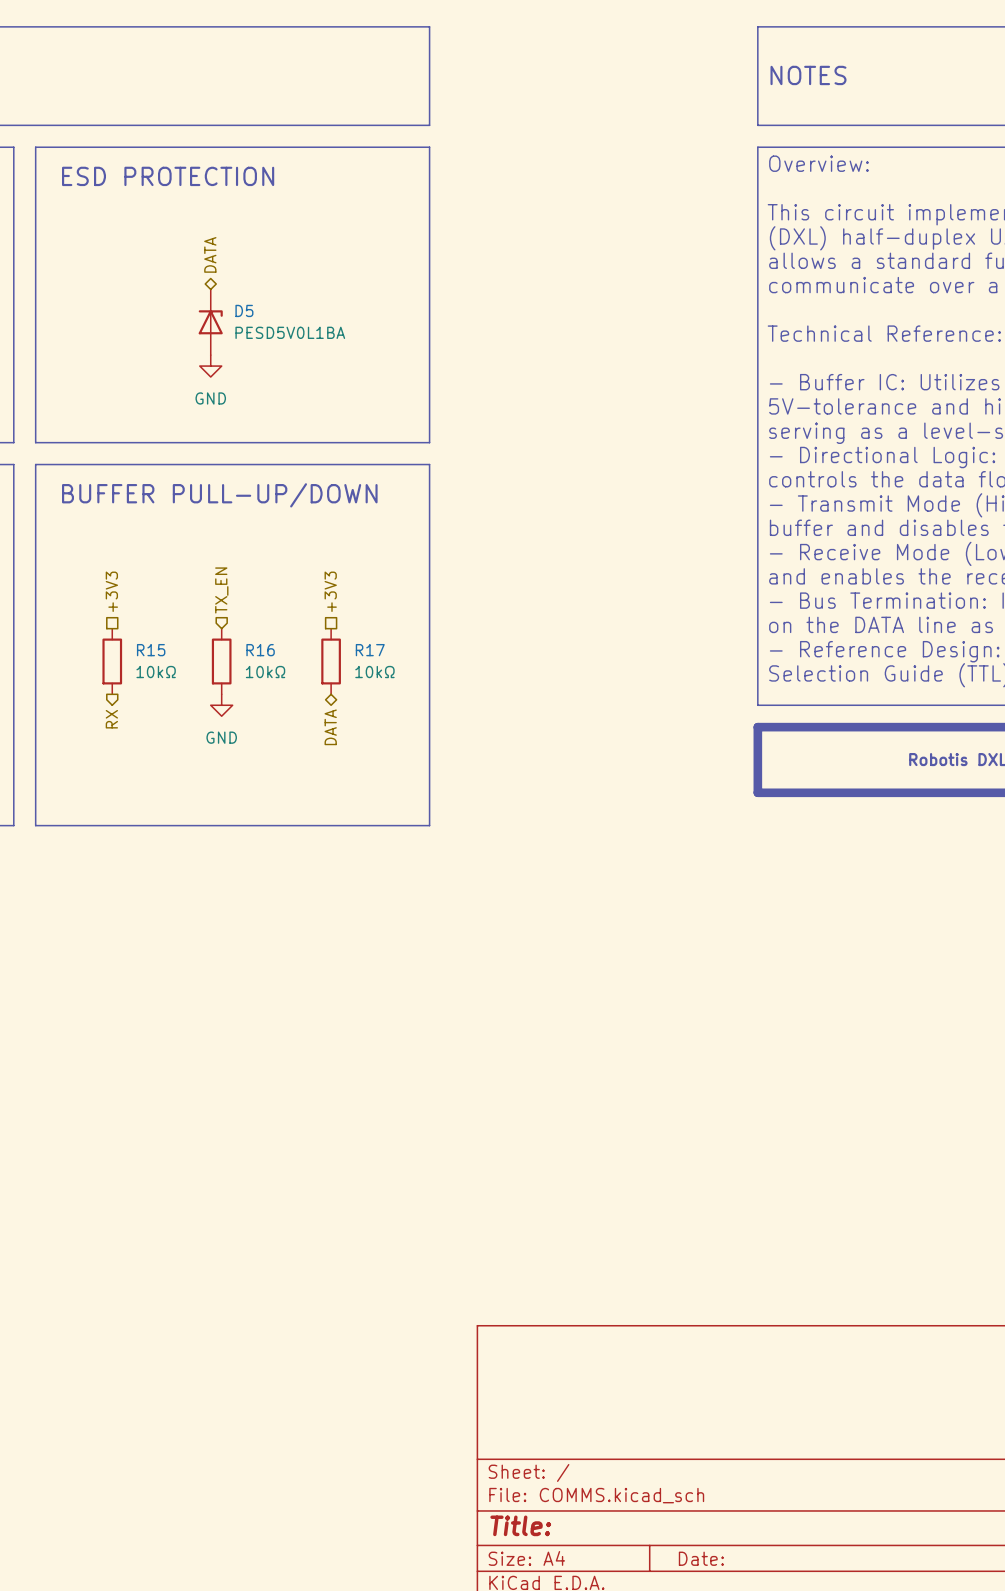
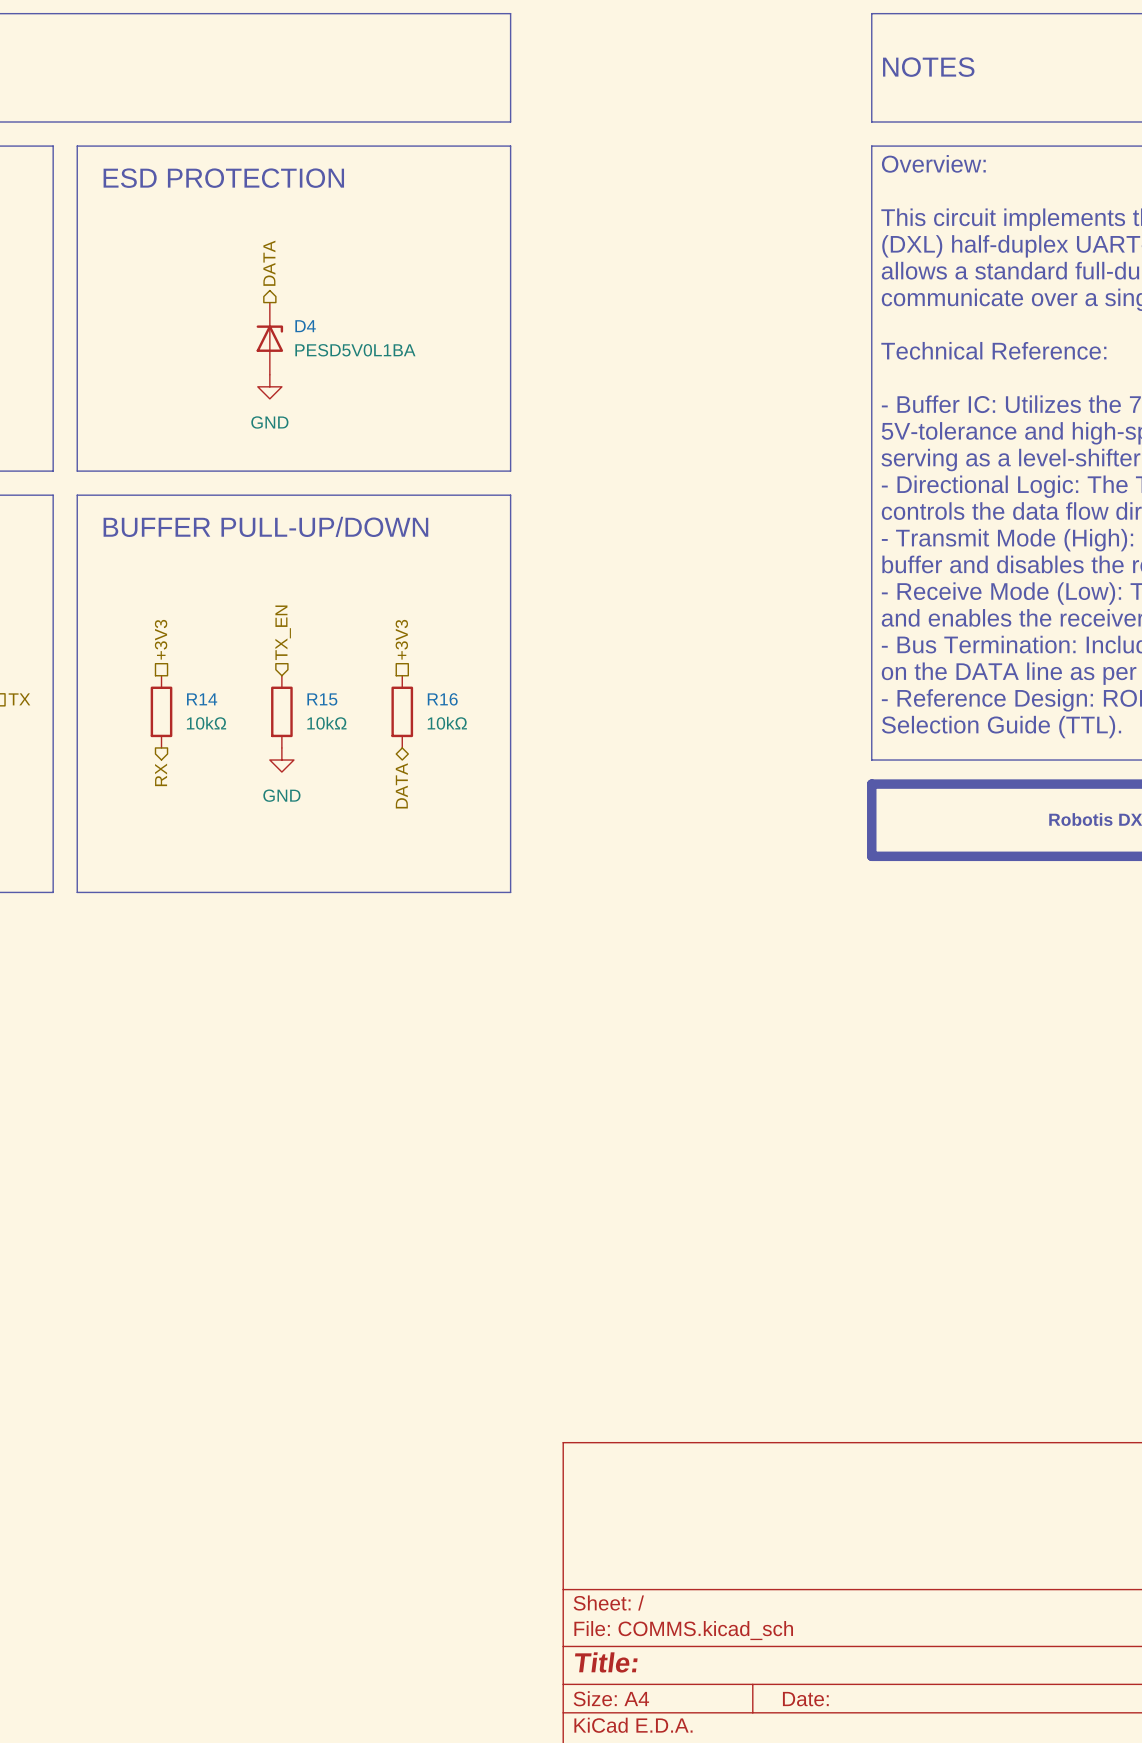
hierarchical label shape: bidirectional (210, 254) -> output (269, 263)
D5 name: D5 (244, 310) -> D4 (305, 326)
R15 name: R15 (151, 650) -> R14 (202, 699)
R16 name: R16 (260, 650) -> R15 (322, 699)
R17 name: R17 (370, 650) -> R16 (442, 699)

